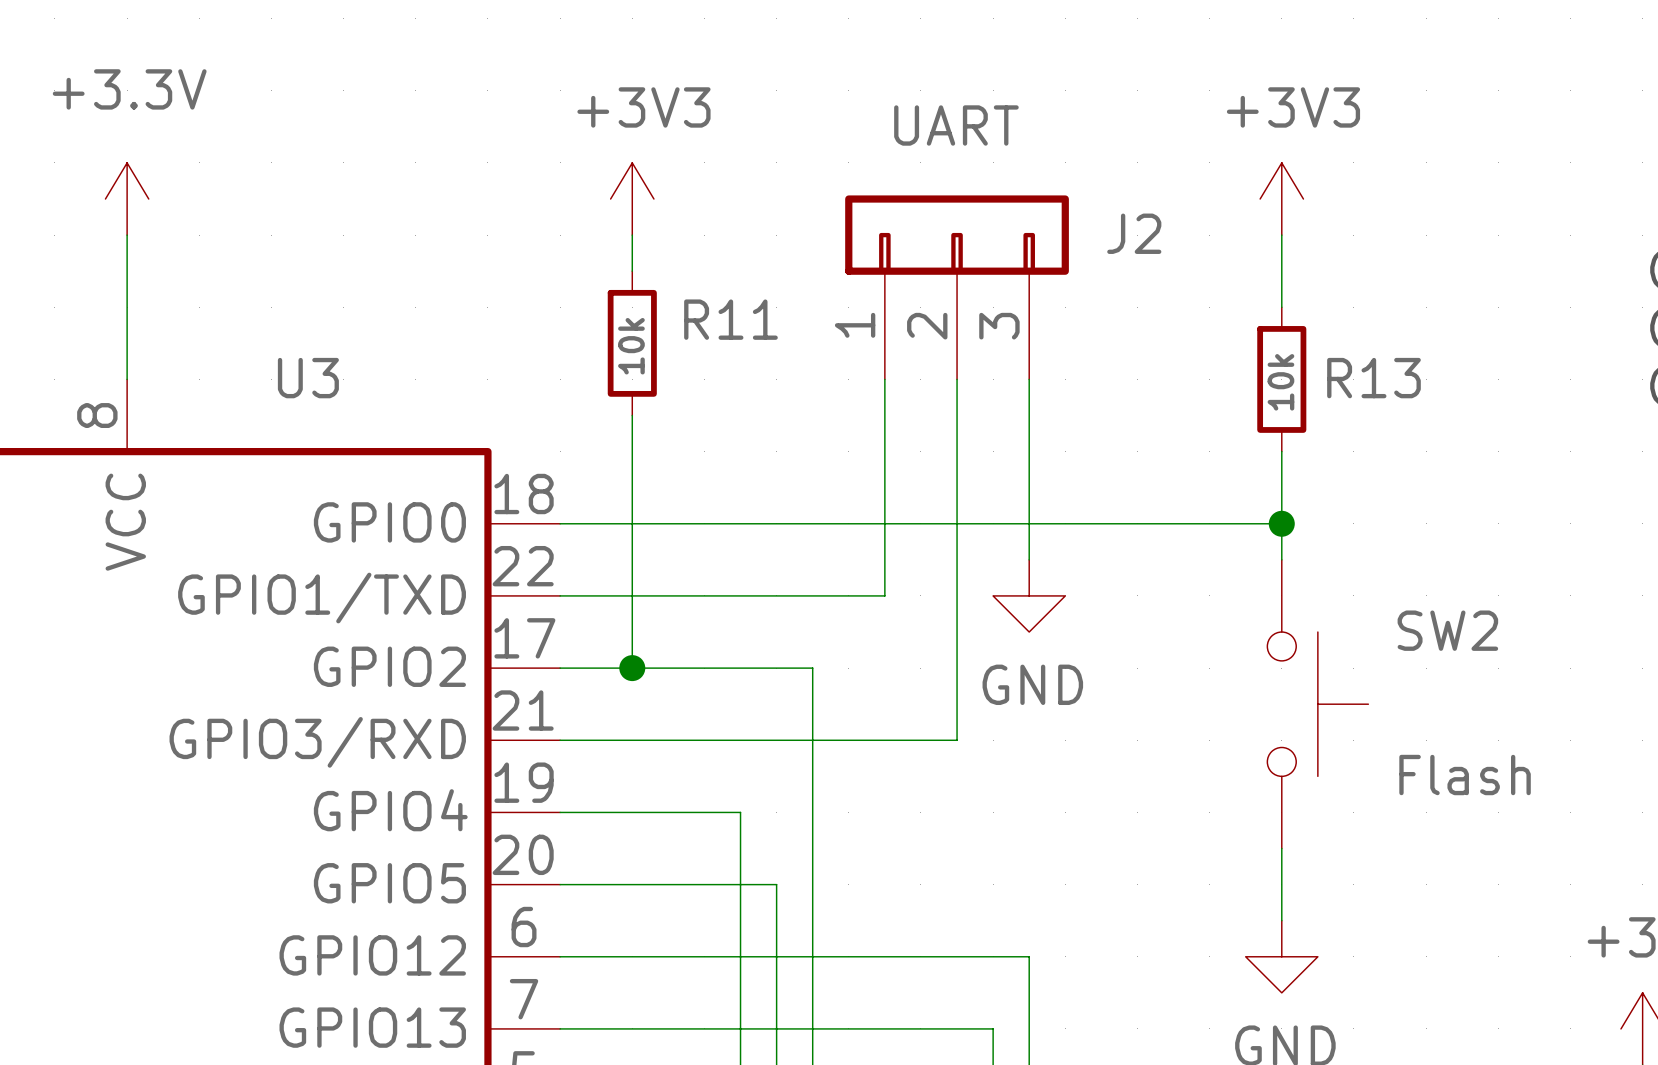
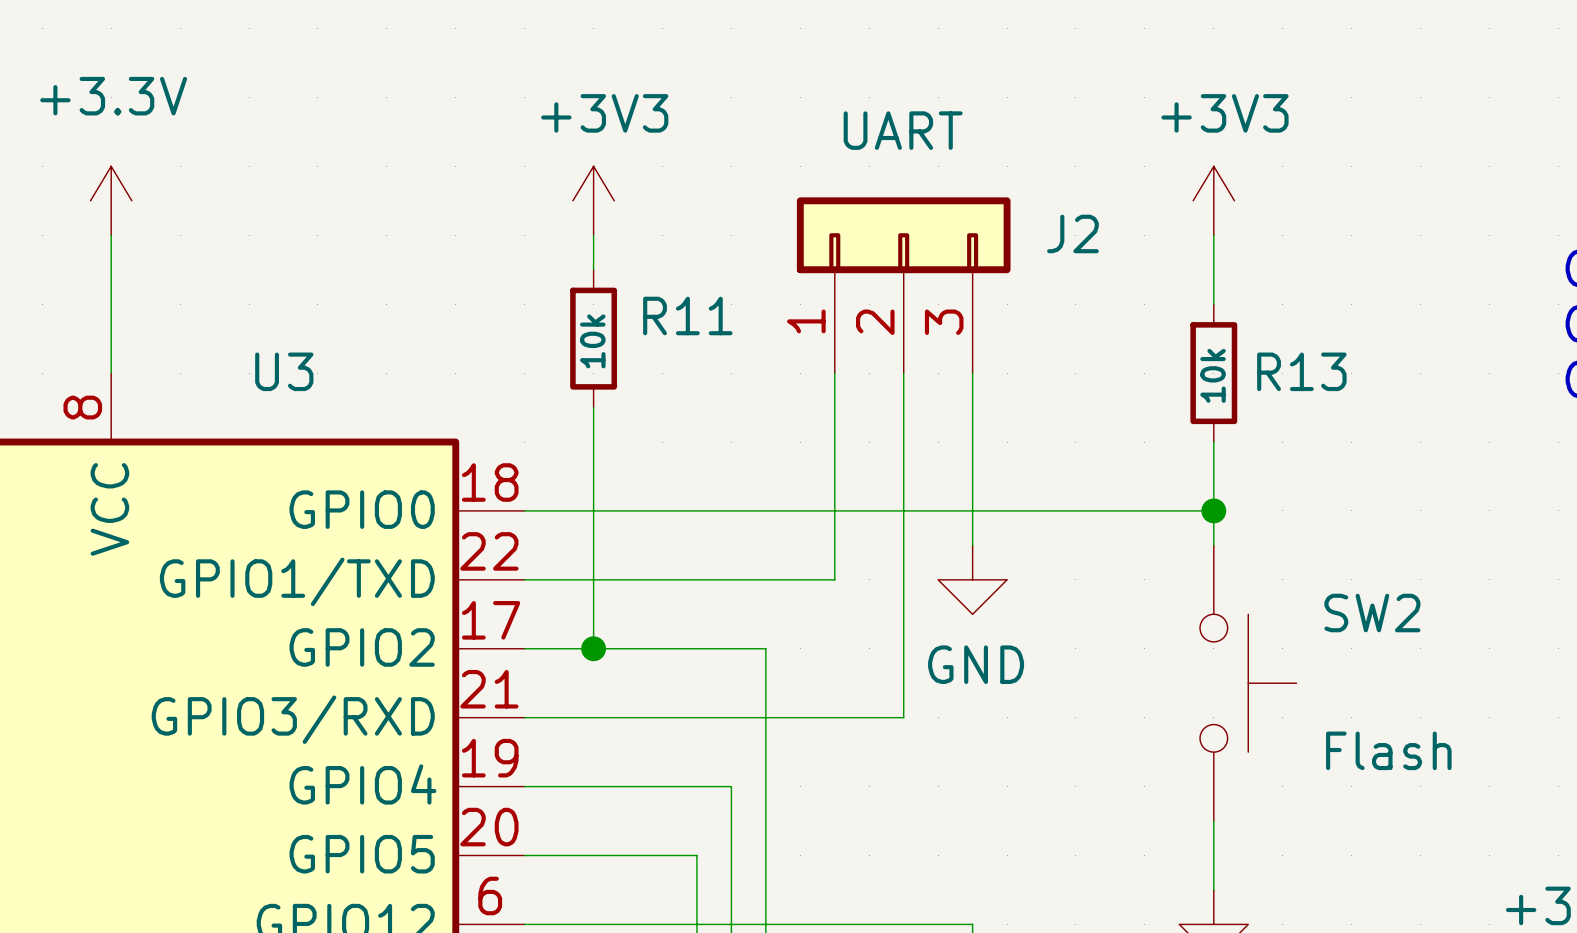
wire: (740, 812) (740, 884) (776, 884) -> (696, 786) (731, 786) (731, 855)

